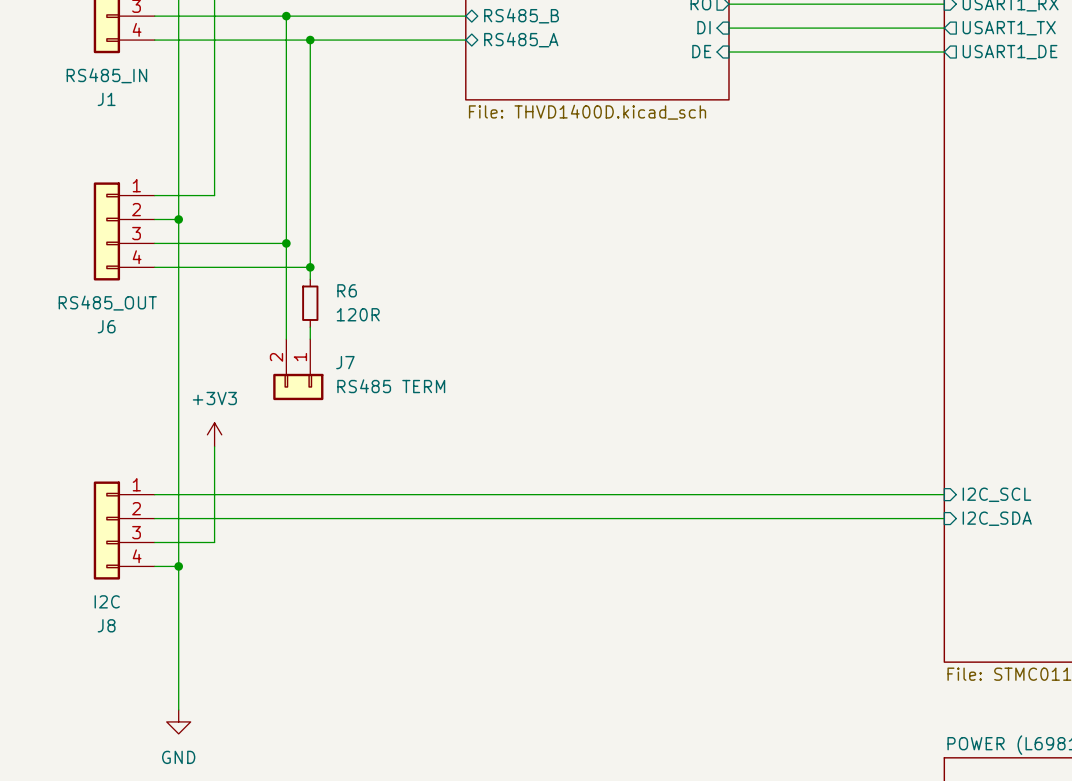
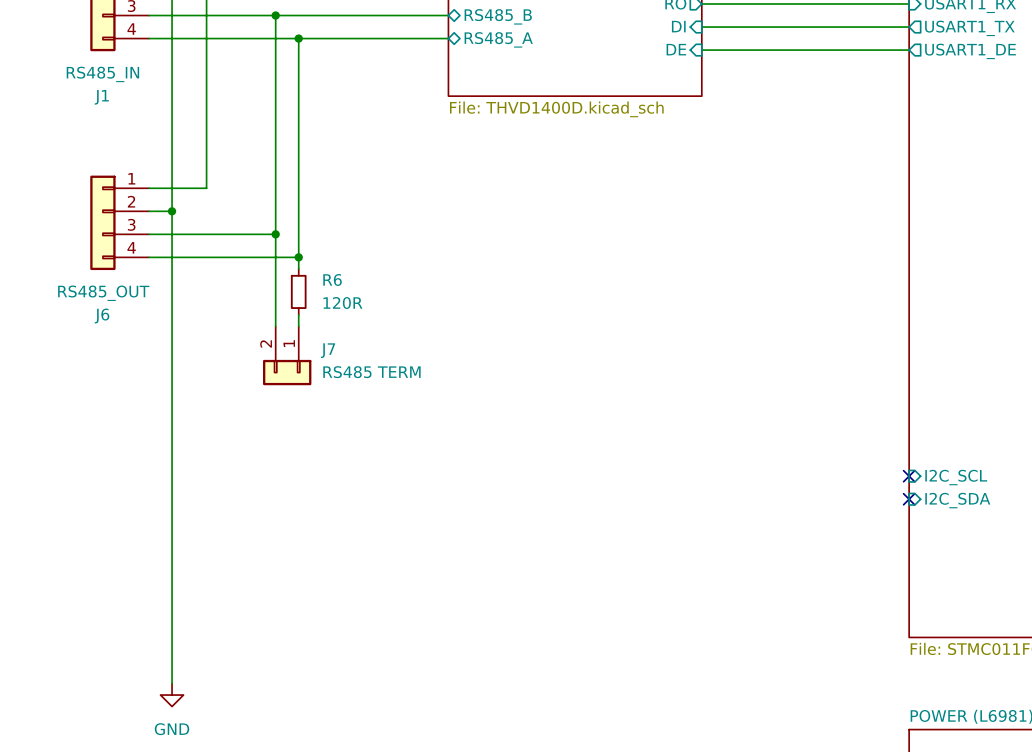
power symbol: +3V3 (214, 434) -> none
wire: (214, 446) (214, 542) (154, 542) -> none
wire: (154, 494) (944, 494) -> none
no-connect mark: none -> (909, 476)
wire: (154, 518) (944, 518) -> none
no-connect mark: none -> (909, 499)
J8: I2C (124, 530) -> none
wire: (154, 566) (178, 566) -> none
junction: (178, 566) -> none

